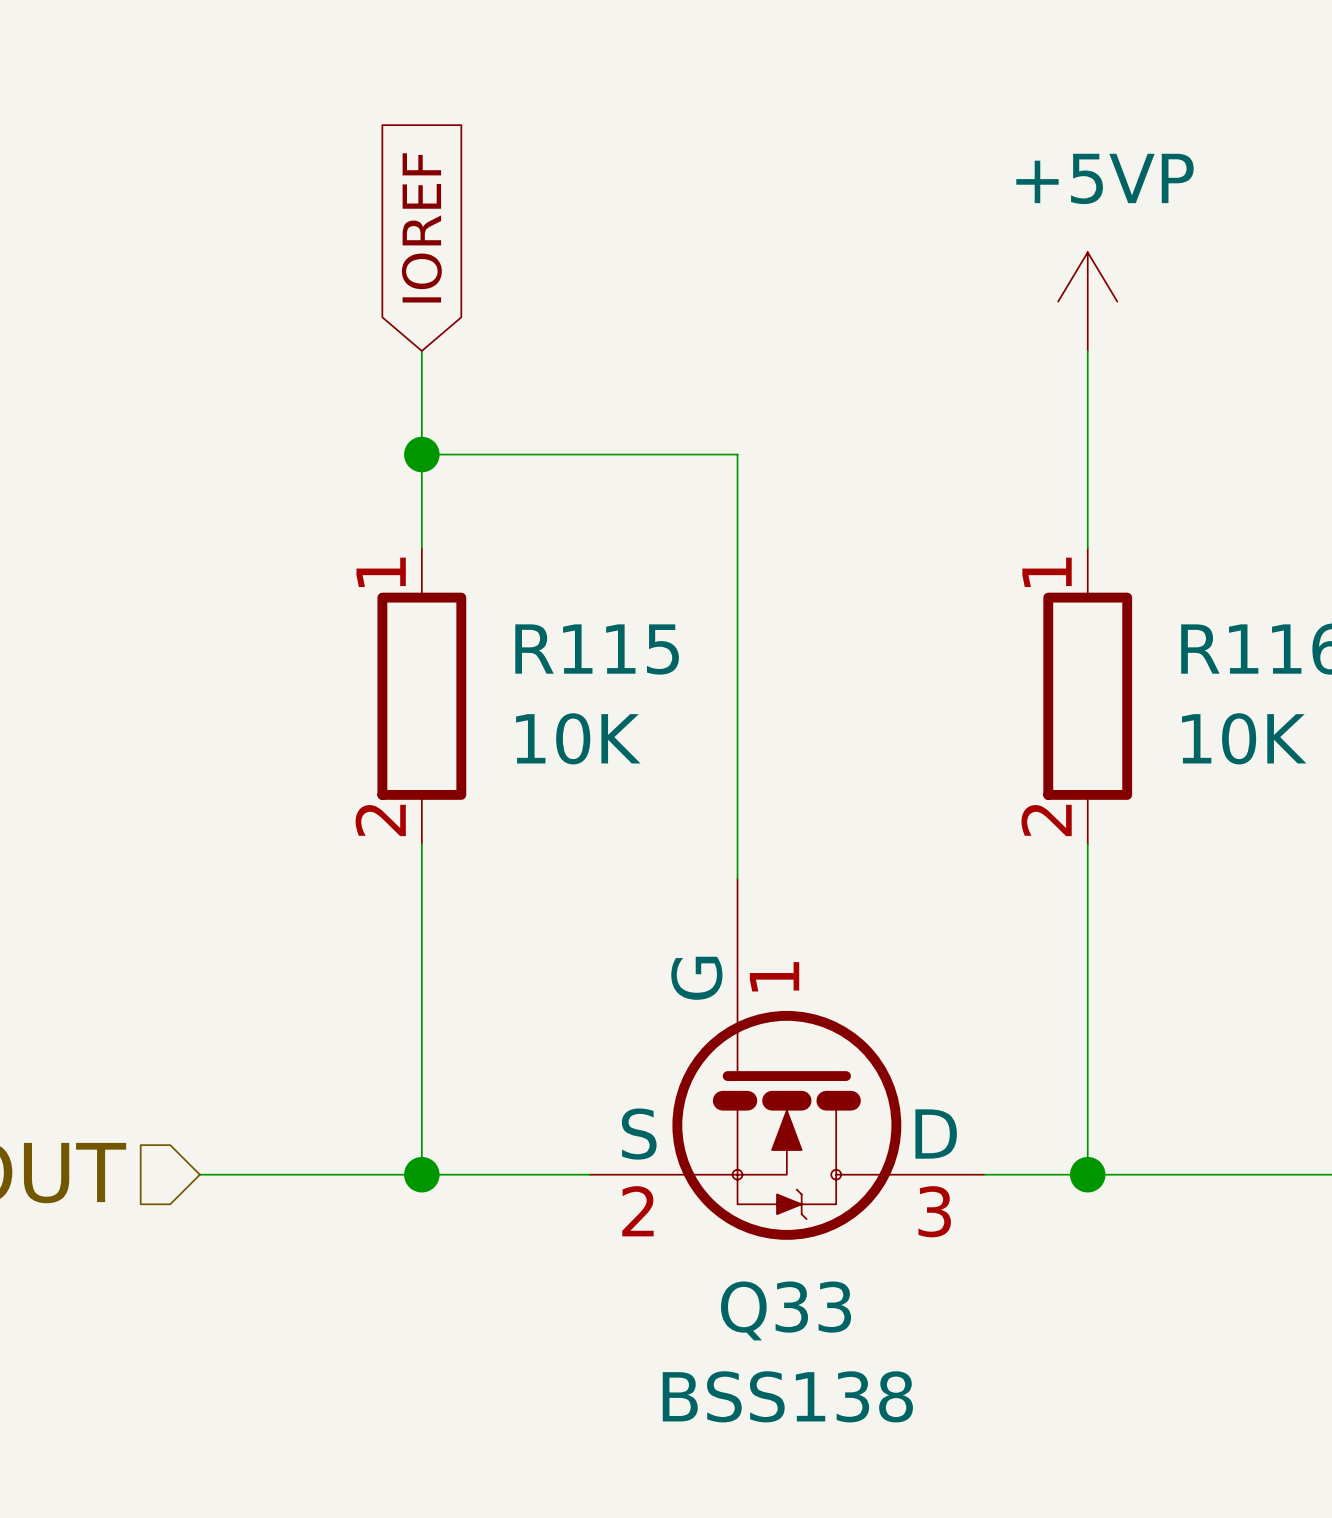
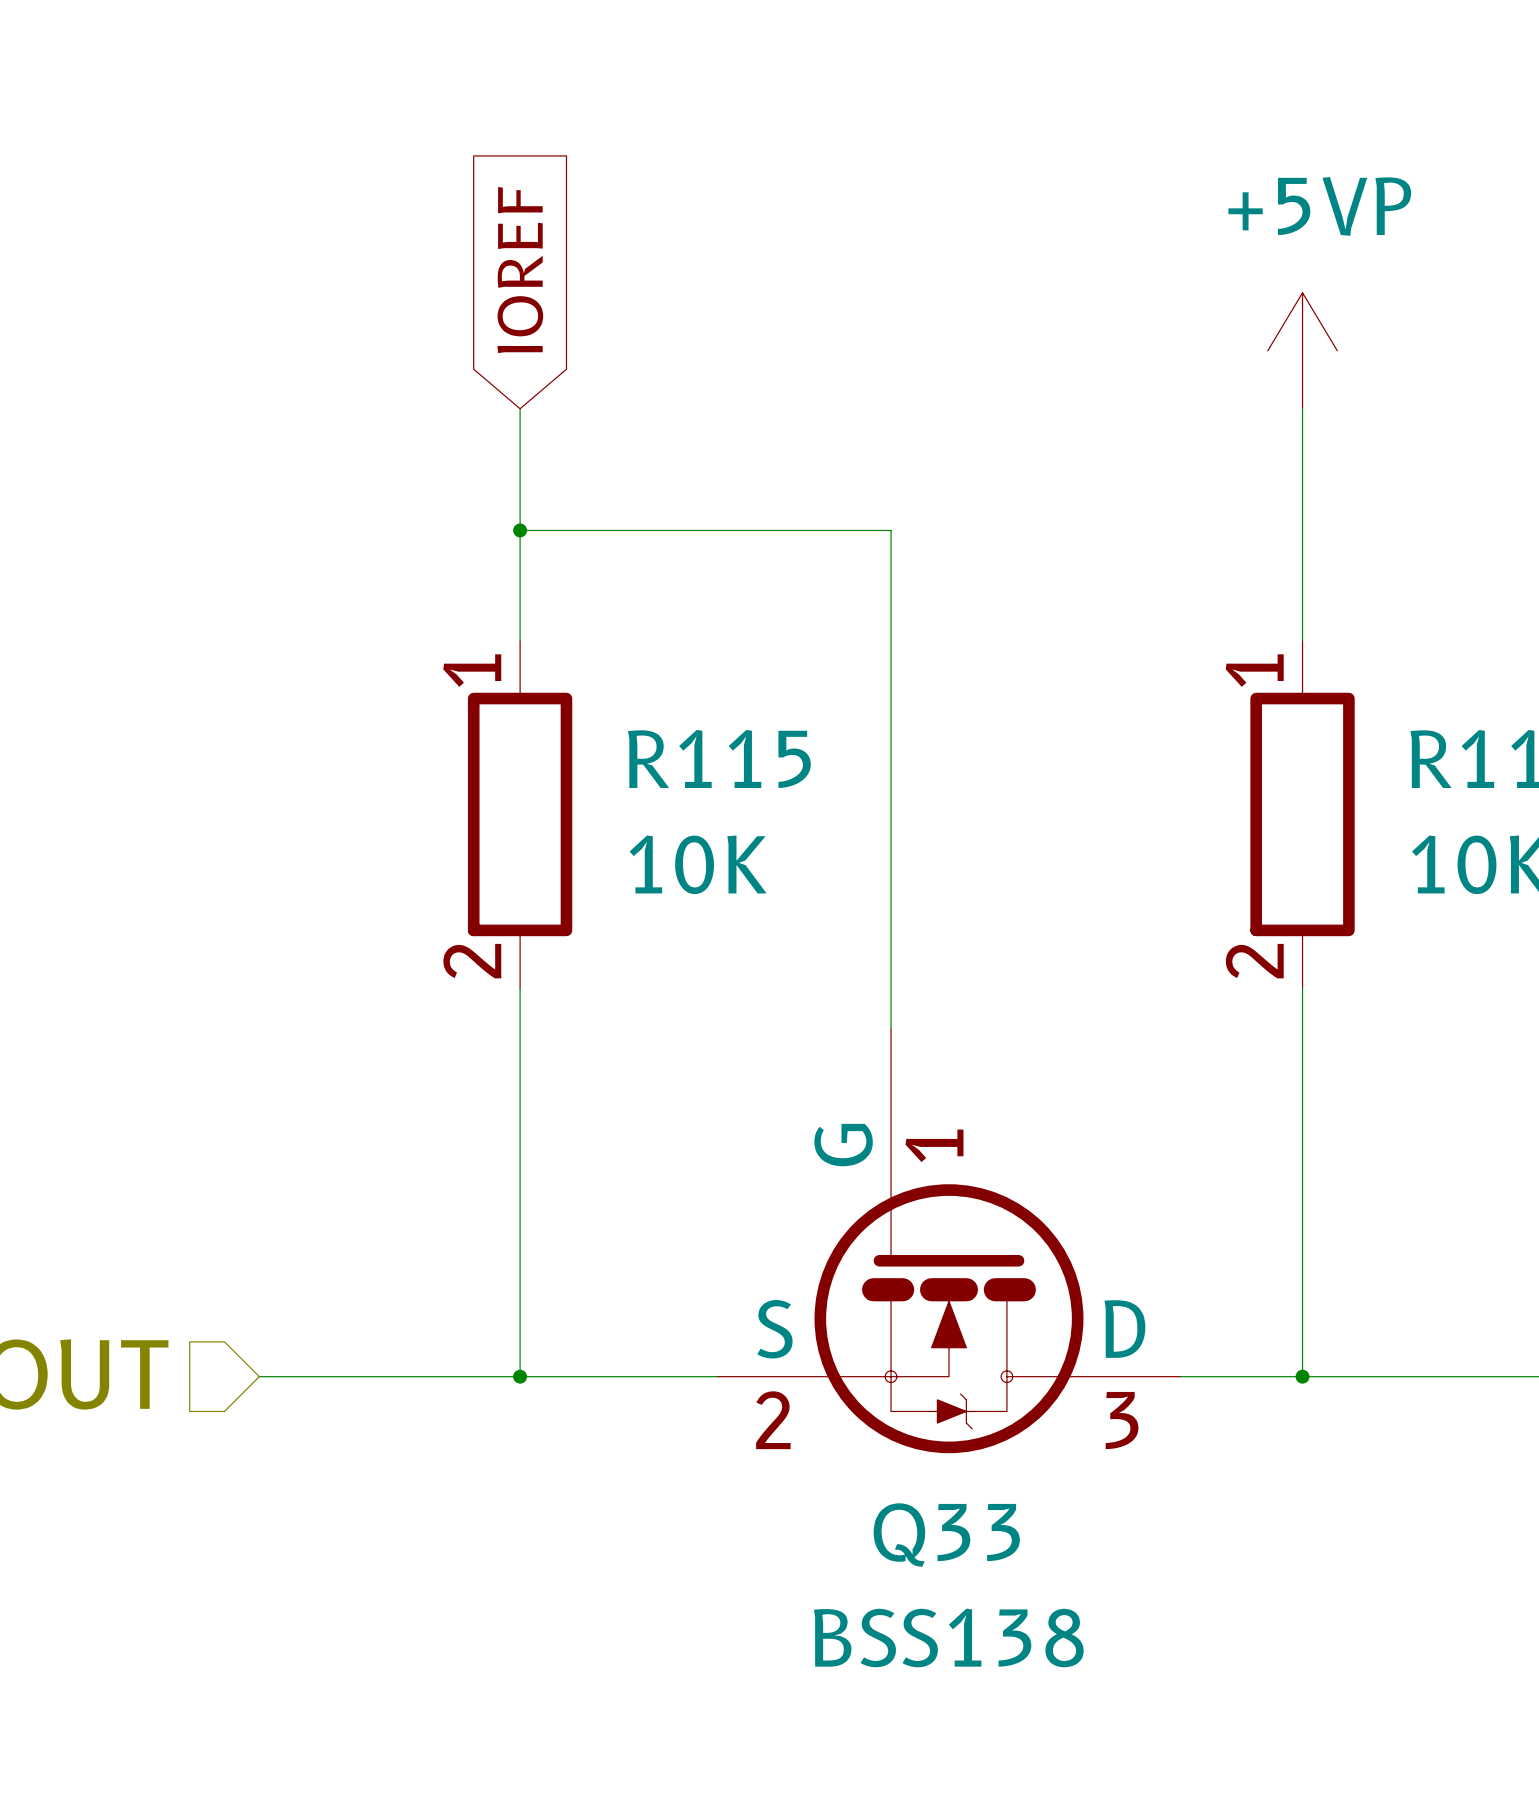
junction size: [404, 436, 440, 473] -> [513, 523, 528, 538]
junction size: [404, 1156, 440, 1193] -> [513, 1369, 528, 1384]
junction size: [1069, 1156, 1106, 1193] -> [1295, 1369, 1310, 1384]

